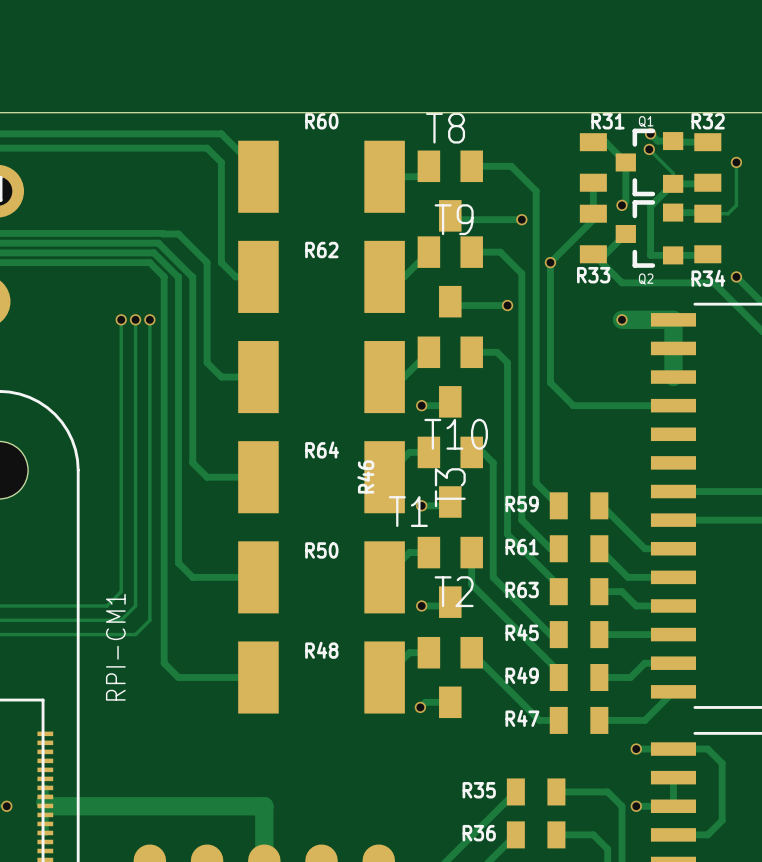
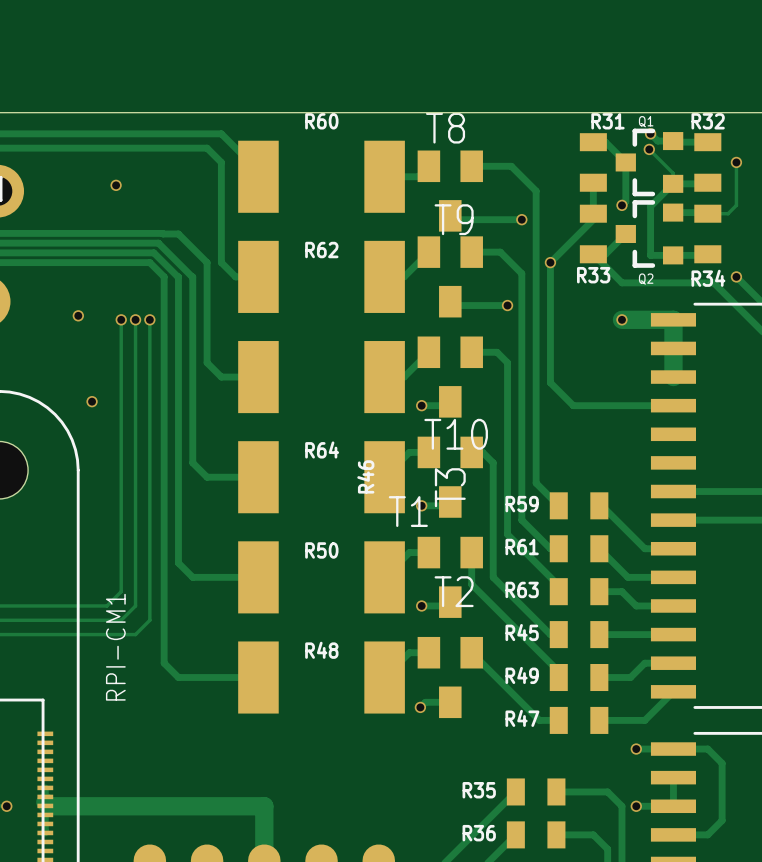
via: none -> (116, 185)
via: none -> (78, 315)
via: none -> (92, 401)

